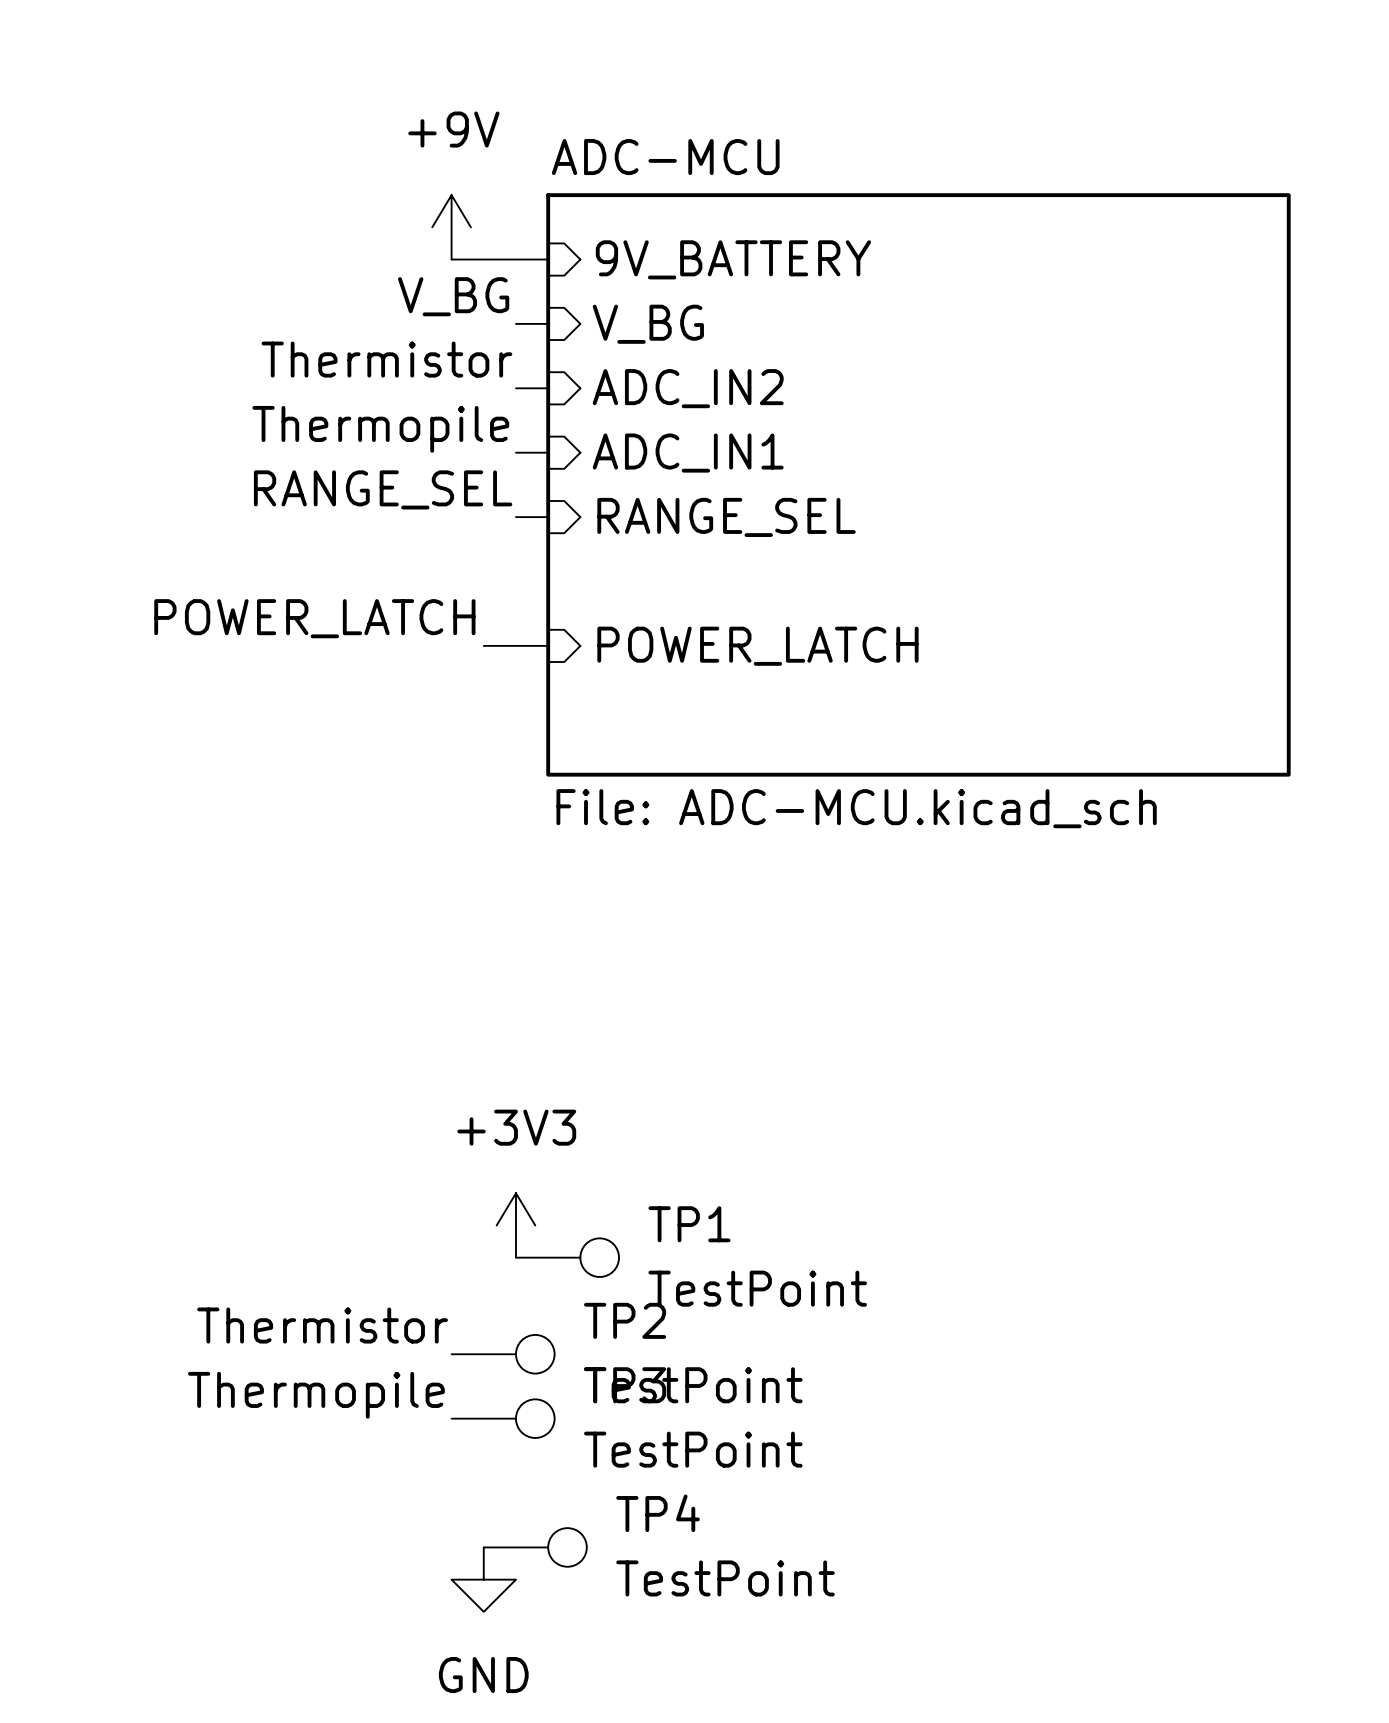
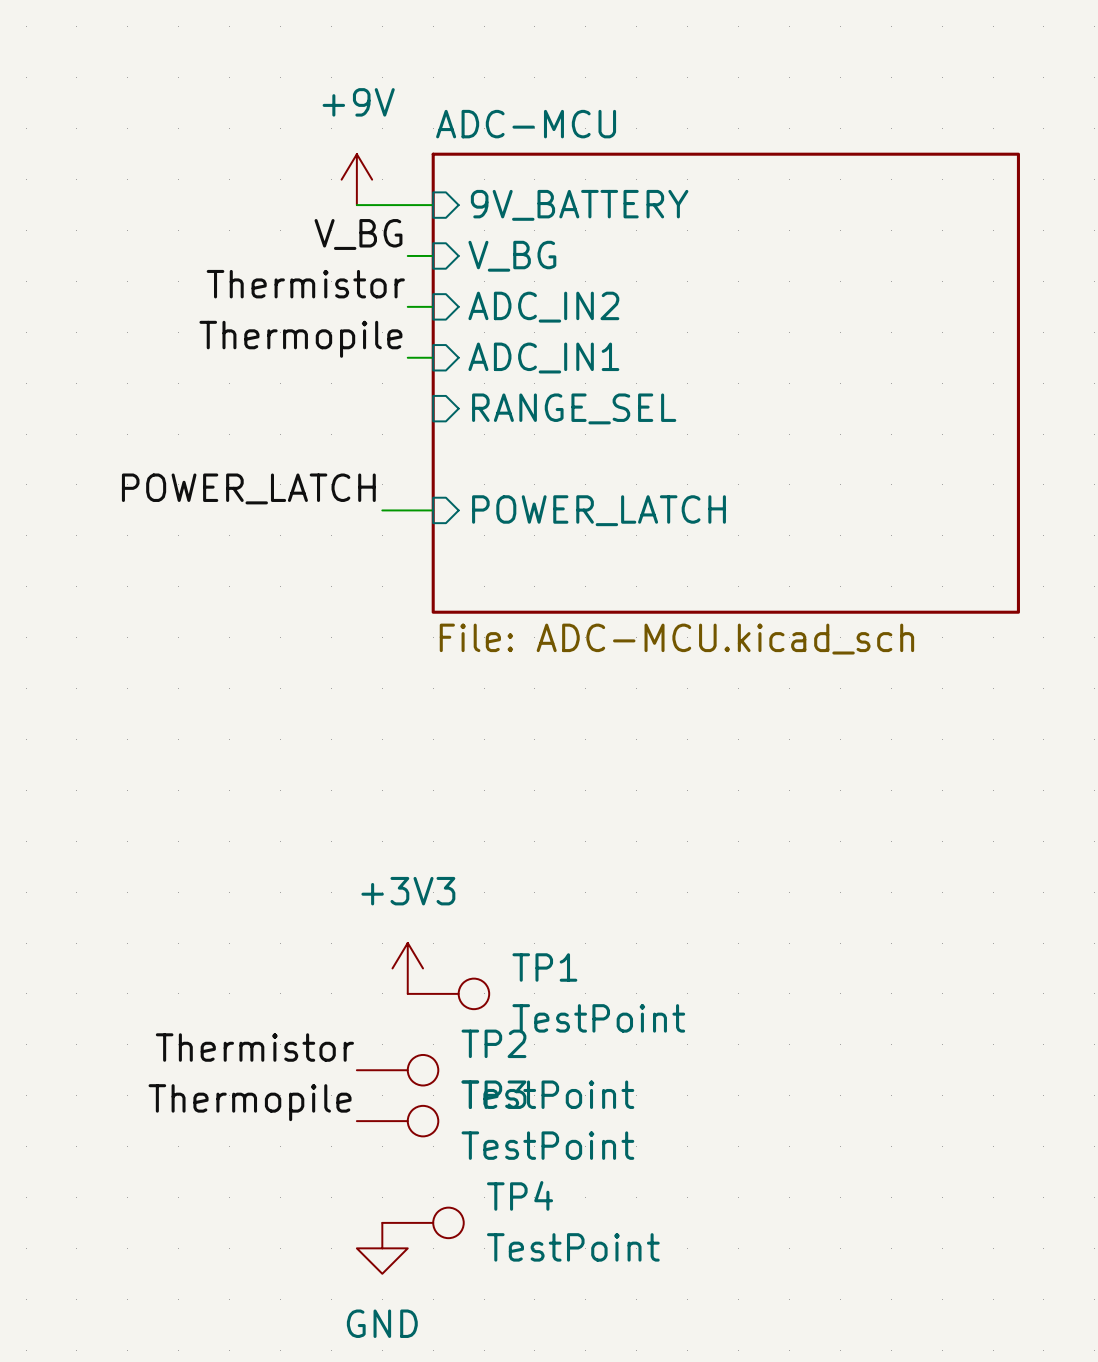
label: RANGE_SEL (383, 489) -> none
wire: (515, 517) (548, 517) -> none

